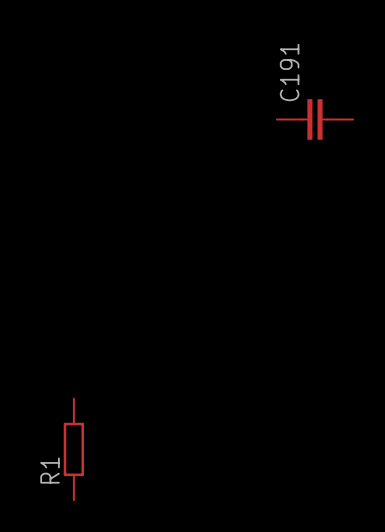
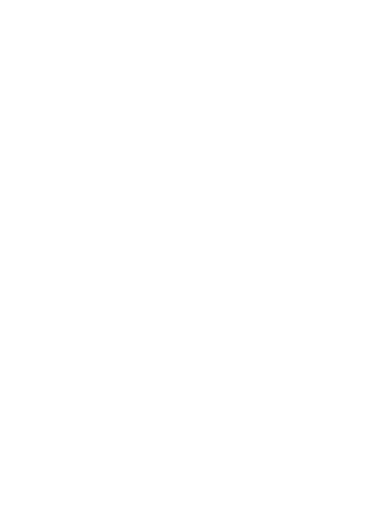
C191: (314, 119) -> none
R1: (73, 449) -> none

